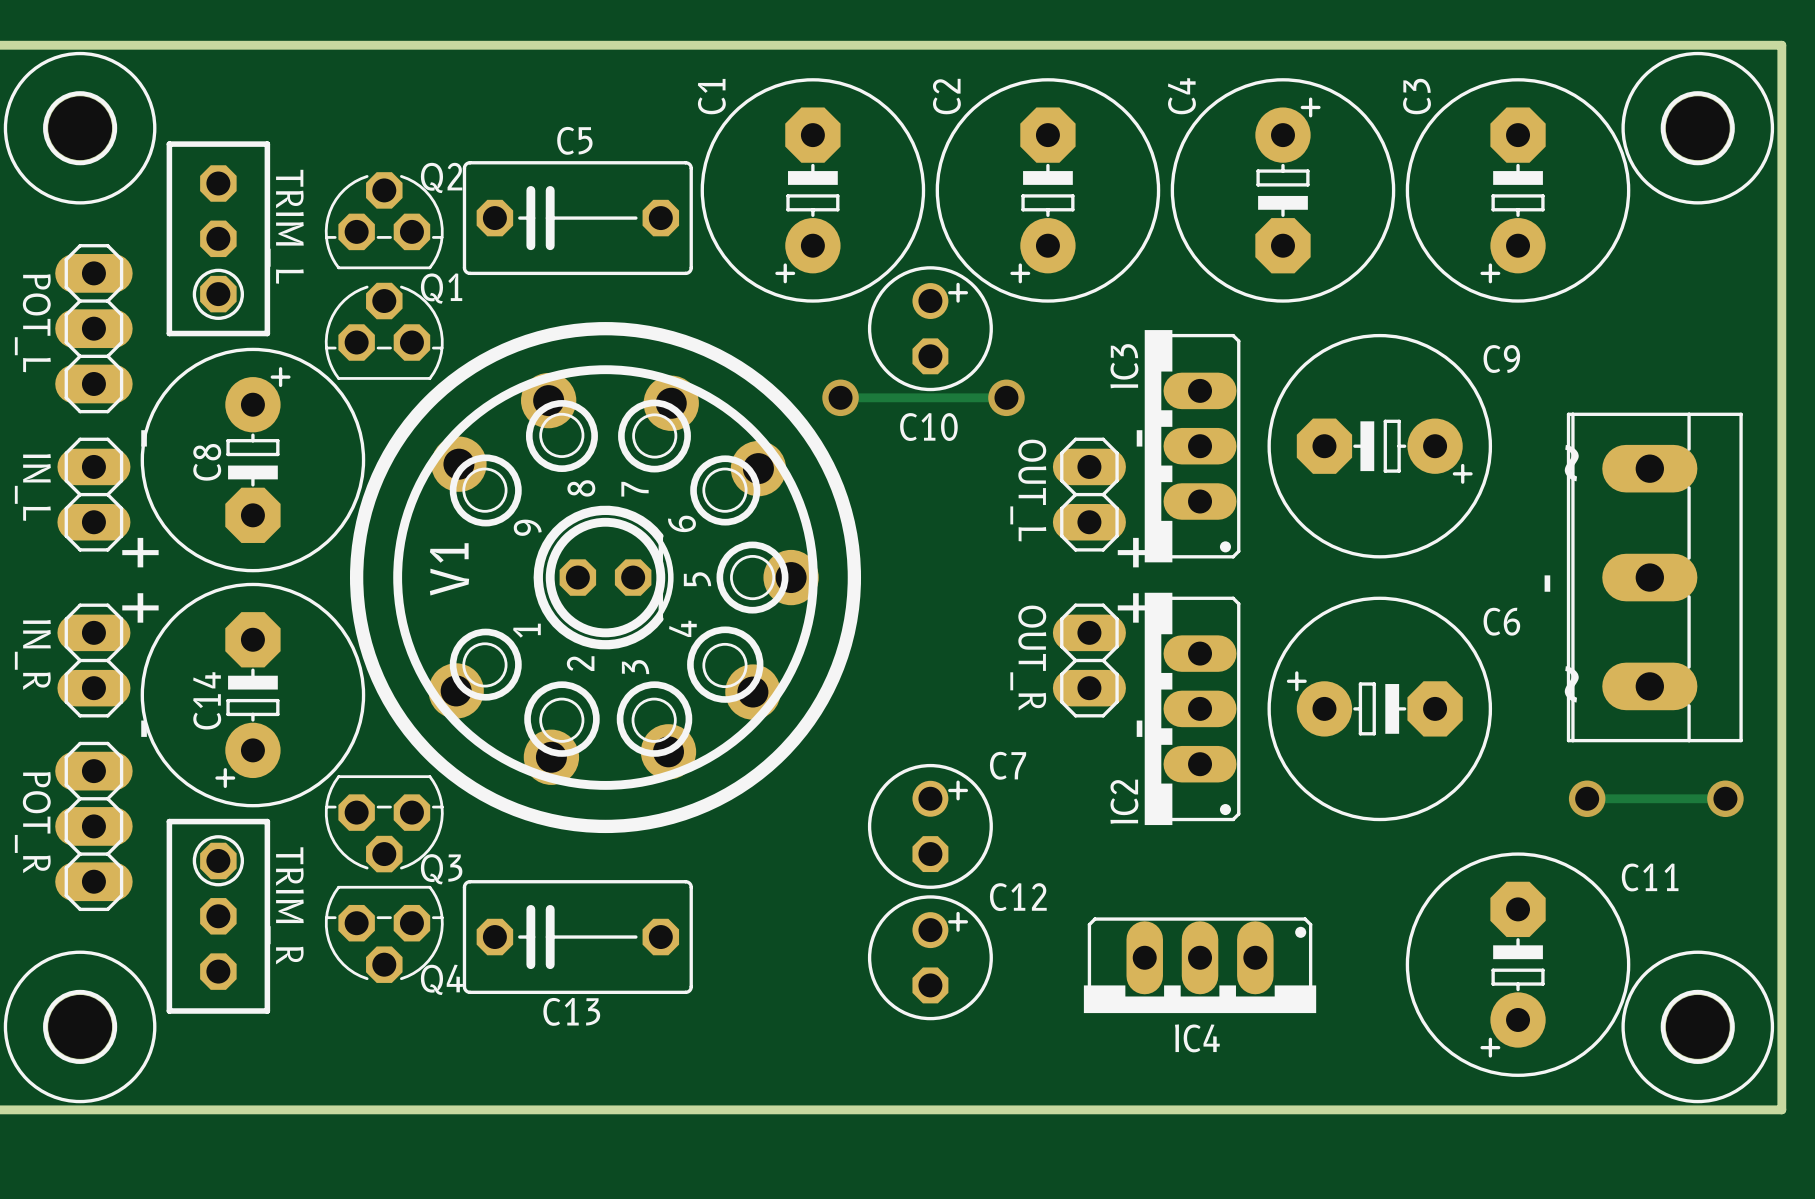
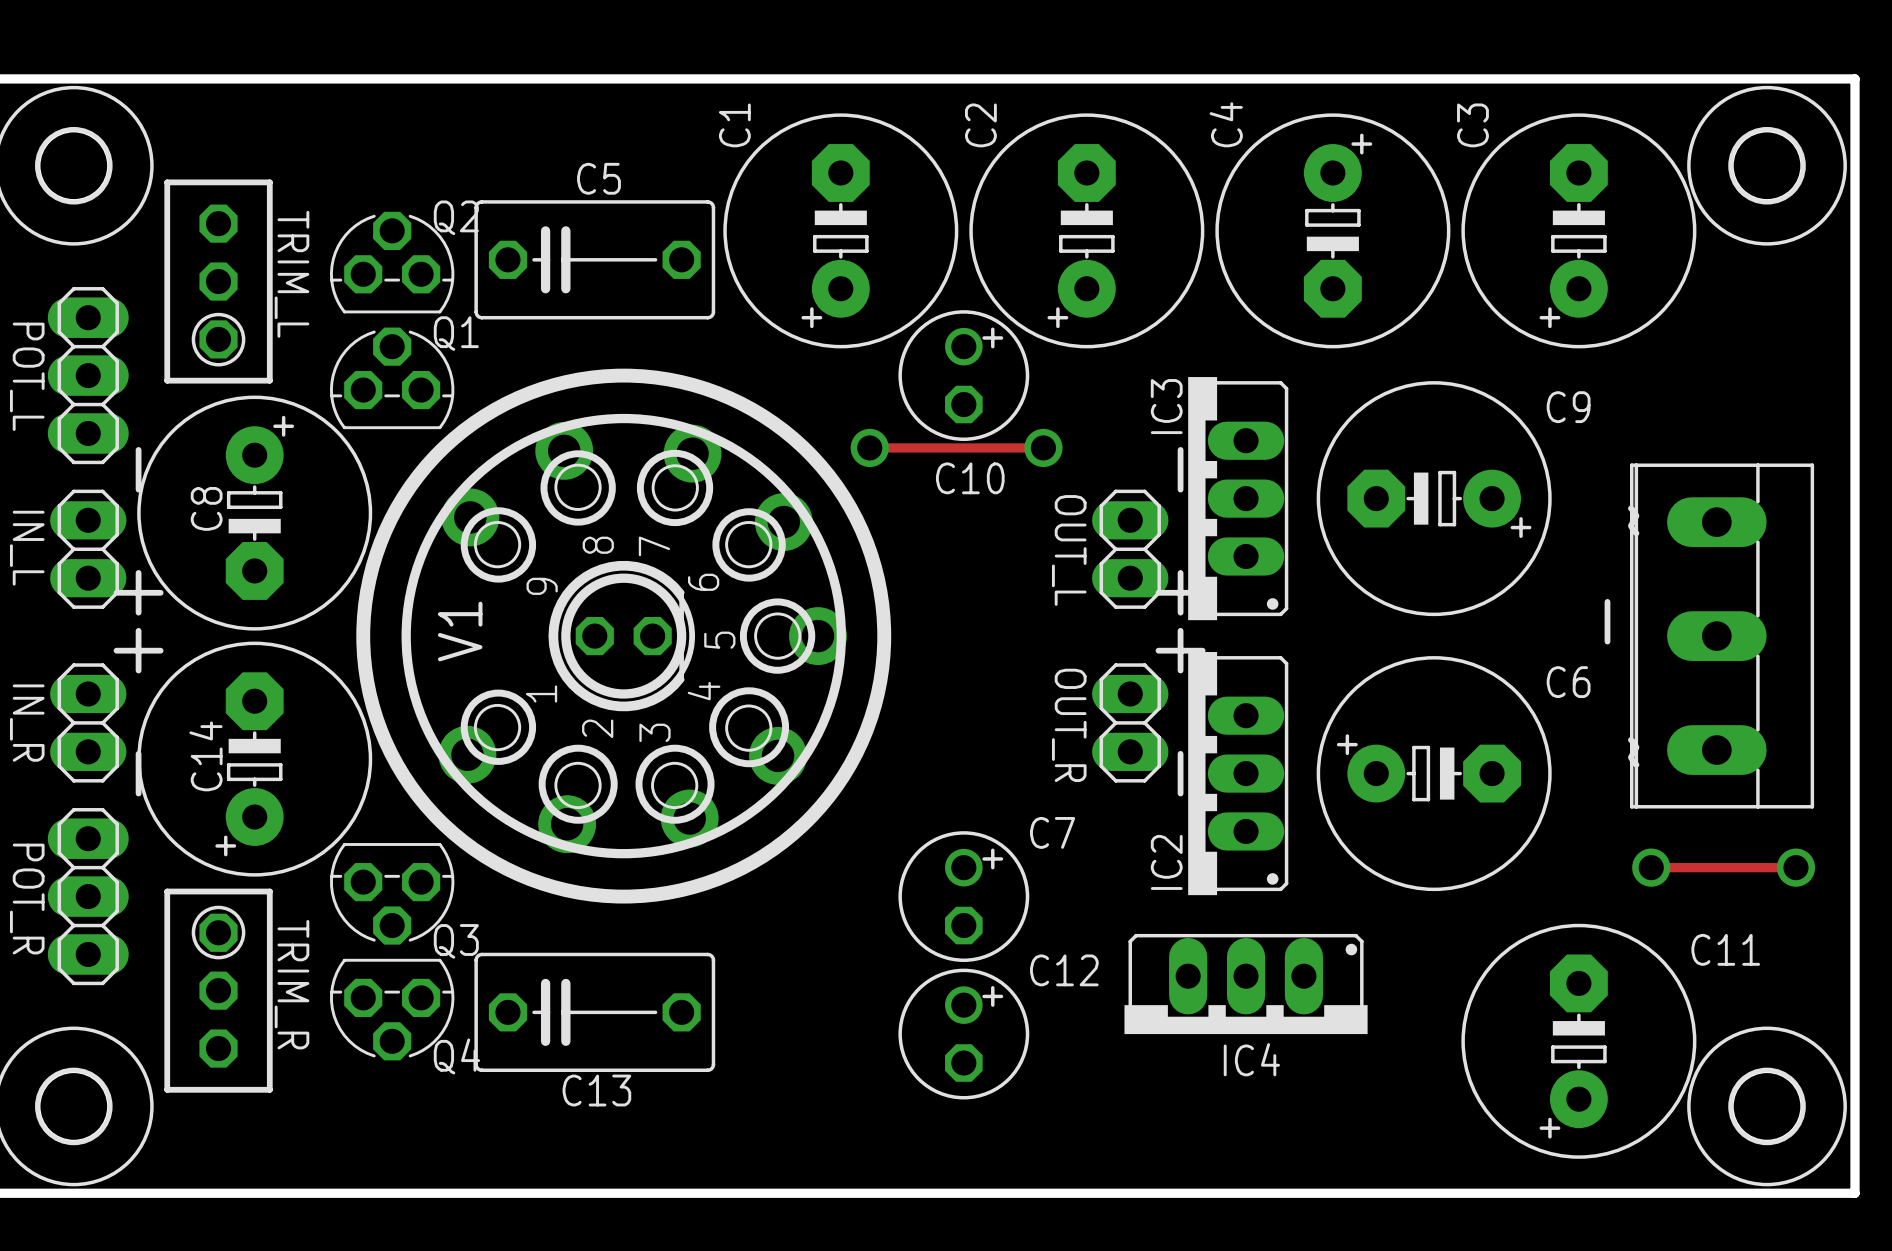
IC4 position: (1200, 965) -> (1246, 984)

